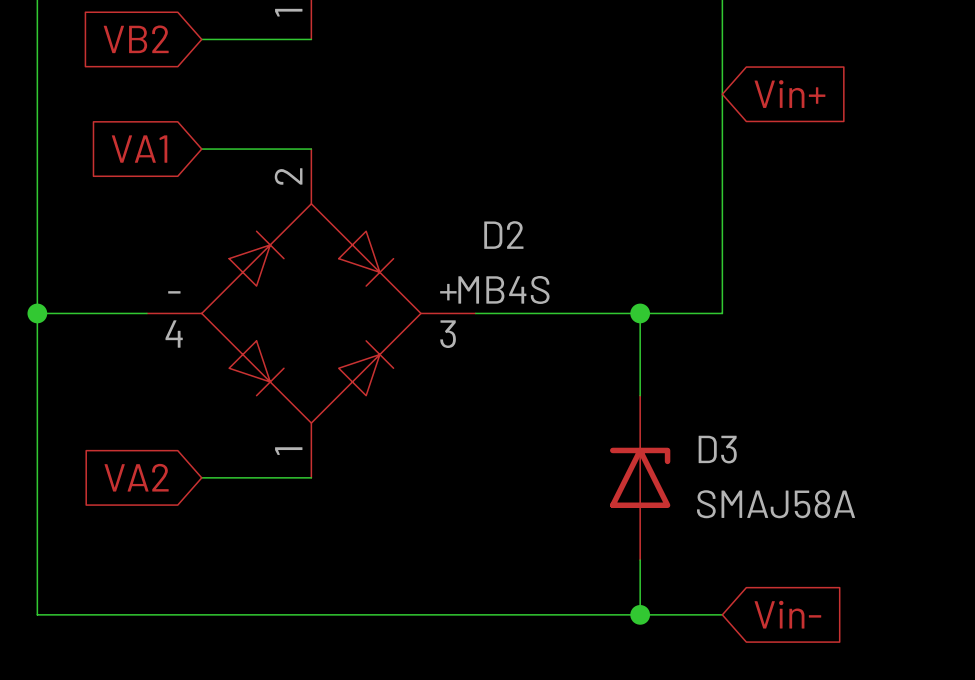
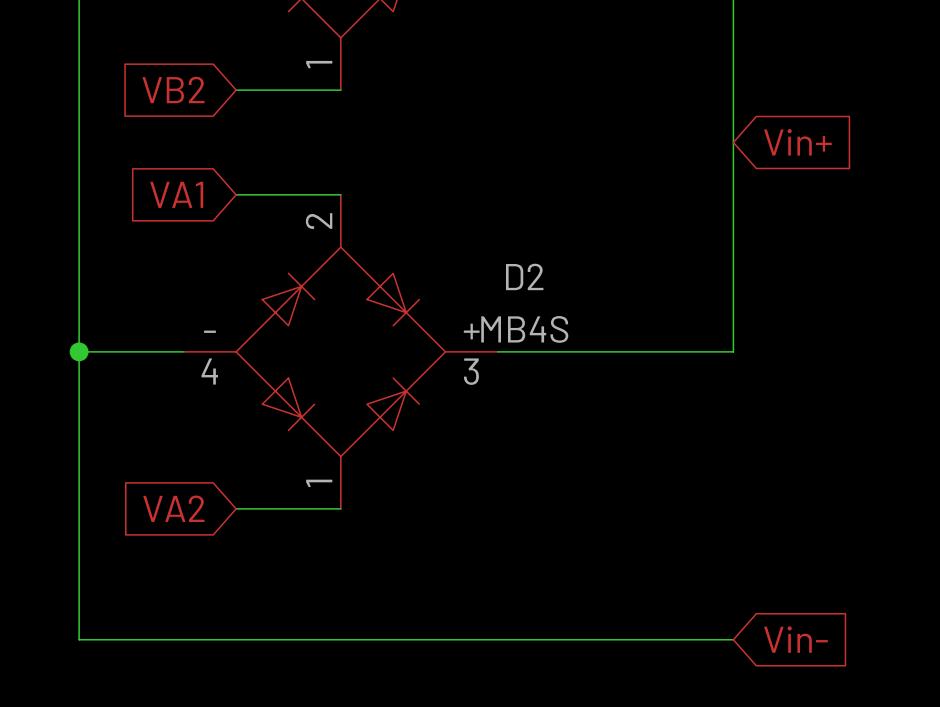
wire: (640, 313) (640, 395) -> none
junction: (640, 313) -> none
D3: SMAJ58A (640, 477) -> none
wire: (640, 560) (640, 614) -> none
junction: (640, 614) -> none

